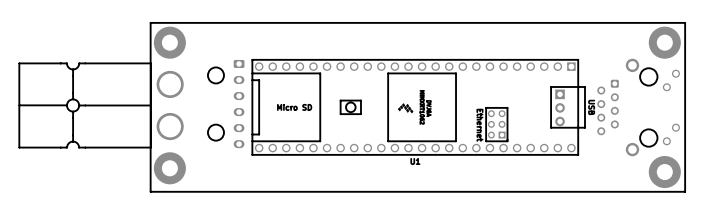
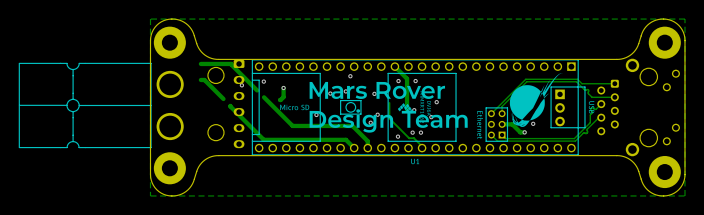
zone outline: none -> (685, 19) (685, 195) (150, 195) (150, 19) (685, 19)
board edge: (685, 22) (150, 22) (150, 191) (685, 191) (685, 22) -> (663, 19) (671, 20) (678, 25) (683, 32) (685, 40) (684, 177) (678, 189) (669, 195) (658, 195) (649, 191) (642, 183) (633, 163) (628, 158) (619, 155) (216, 155) (209, 157) (201, 163) (191, 186) (179, 194) (169, 195) (161, 193) (154, 187) (151, 180) (150, 37) (156, 25) (166, 19) (176, 19) (186, 23) (192, 31) (201, 52) (207, 56) (216, 59) (616, 59) (623, 58) (632, 53) (636, 48) (645, 27) (653, 20) (663, 19)
track: none -> (200, 63) (231, 63) (257, 90)
track: none -> (394, 67) (407, 78) (407, 109)
drawing: none -> [509, 73, 563, 127]
via: none -> (350, 76)
track: none -> (200, 79) (204, 79) (223, 98)
via: none -> (263, 81)
drawing: none -> [309, 81, 468, 133]
via: none -> (398, 81)
via: none -> (415, 81)
track: none -> (614, 83) (581, 83) (577, 79) (525, 79) (491, 113)
via: none -> (241, 85)
track: none -> (283, 88) (283, 97) (280, 100)
via: none -> (283, 88)
via: none -> (345, 91)
via: none -> (330, 93)
via: none -> (374, 93)
track: none -> (264, 97) (292, 125) (352, 125) (367, 141) (367, 148)
track: none -> (614, 97) (592, 97) (588, 93) (588, 89) (584, 90) (576, 81) (526, 81) (502, 106) (502, 113)
track: none -> (389, 102) (389, 118) (409, 138) (414, 138) (422, 148)
via: none -> (436, 102)
track: none -> (601, 104) (595, 109) (591, 108) (590, 122) (574, 138) (505, 138) (502, 135)
track: none -> (230, 105) (263, 139) (345, 139) (354, 148)
via: none -> (414, 110)
via: none -> (316, 114)
via: none -> (377, 114)
via: none -> (431, 117)
track: none -> (601, 117) (598, 117) (587, 129) (586, 133) (583, 133) (575, 141) (497, 141) (491, 135) (491, 137)
via: none -> (370, 122)
via: none -> (533, 123)
track: none -> (502, 124) (512, 124) (520, 132) (524, 132)
via: none -> (412, 132)
via: none -> (420, 132)
via: none -> (524, 132)
via: none -> (397, 136)

